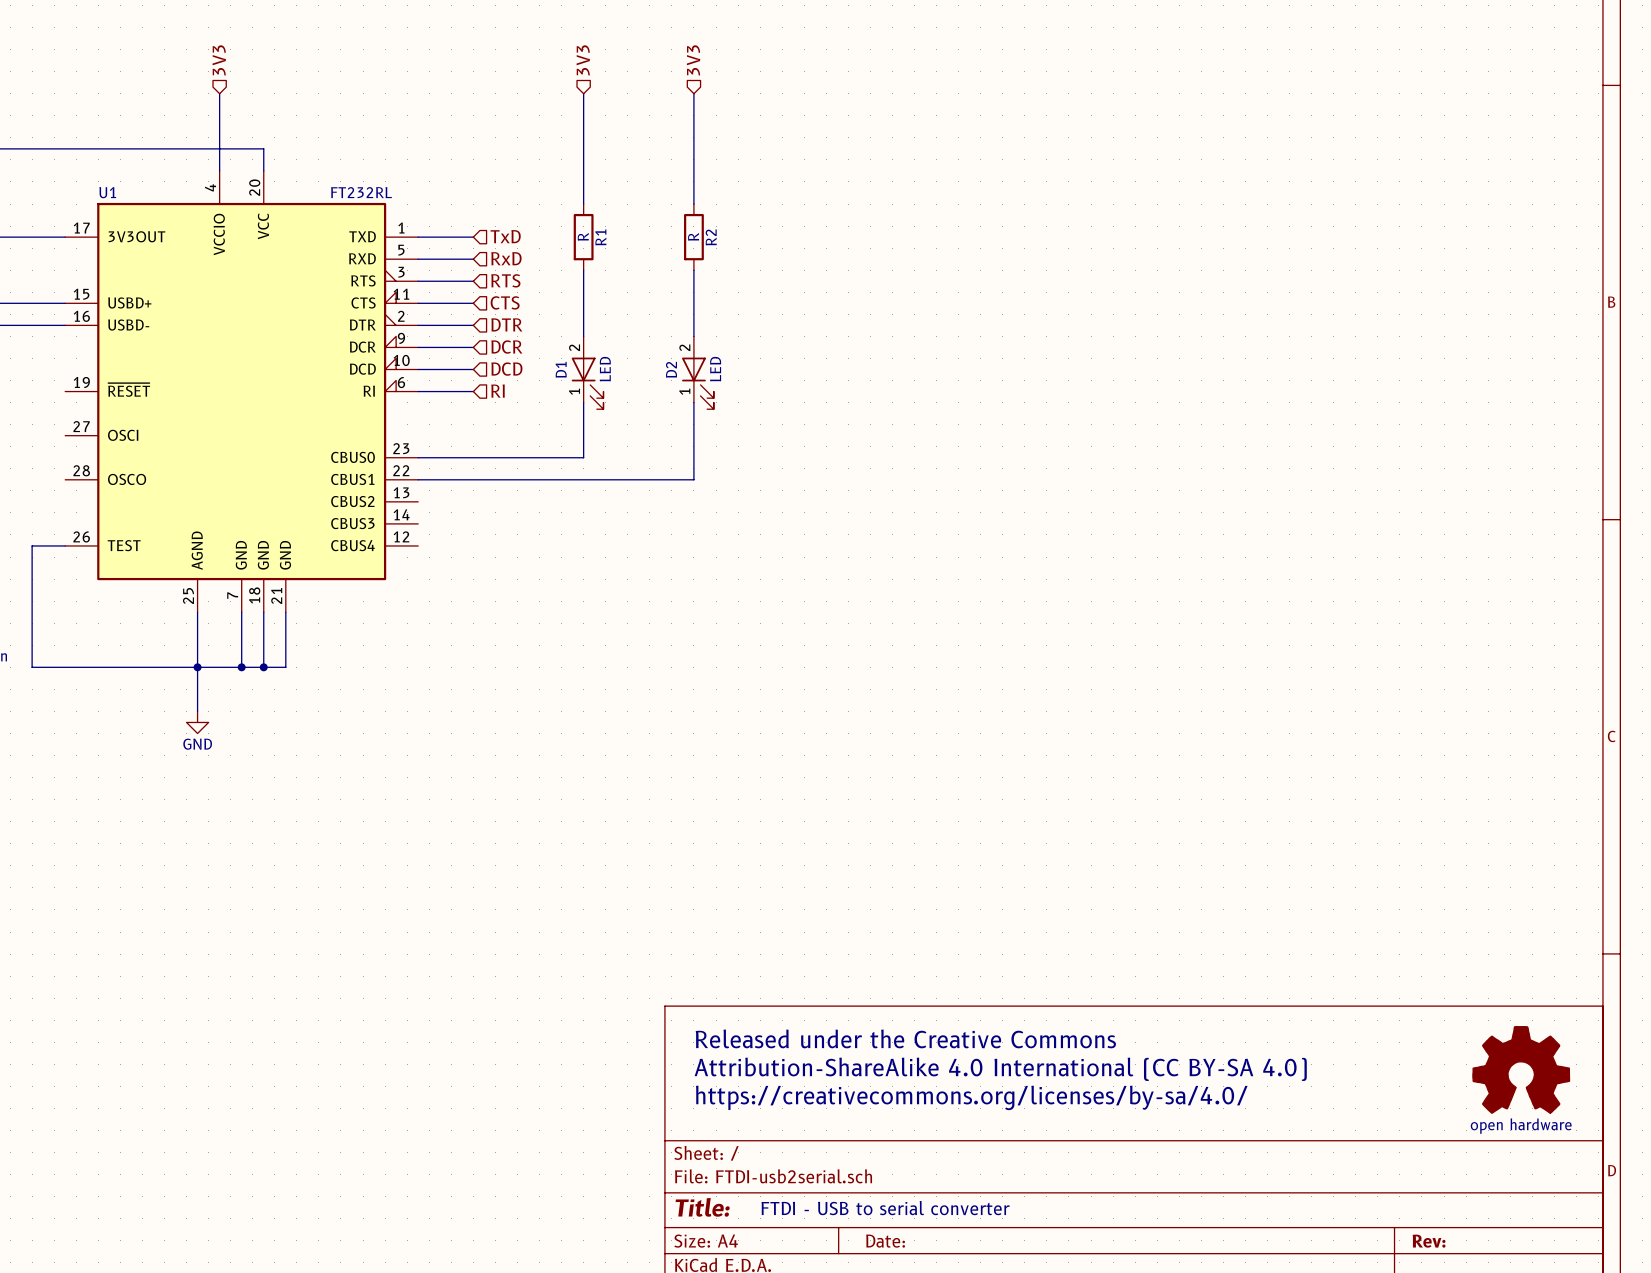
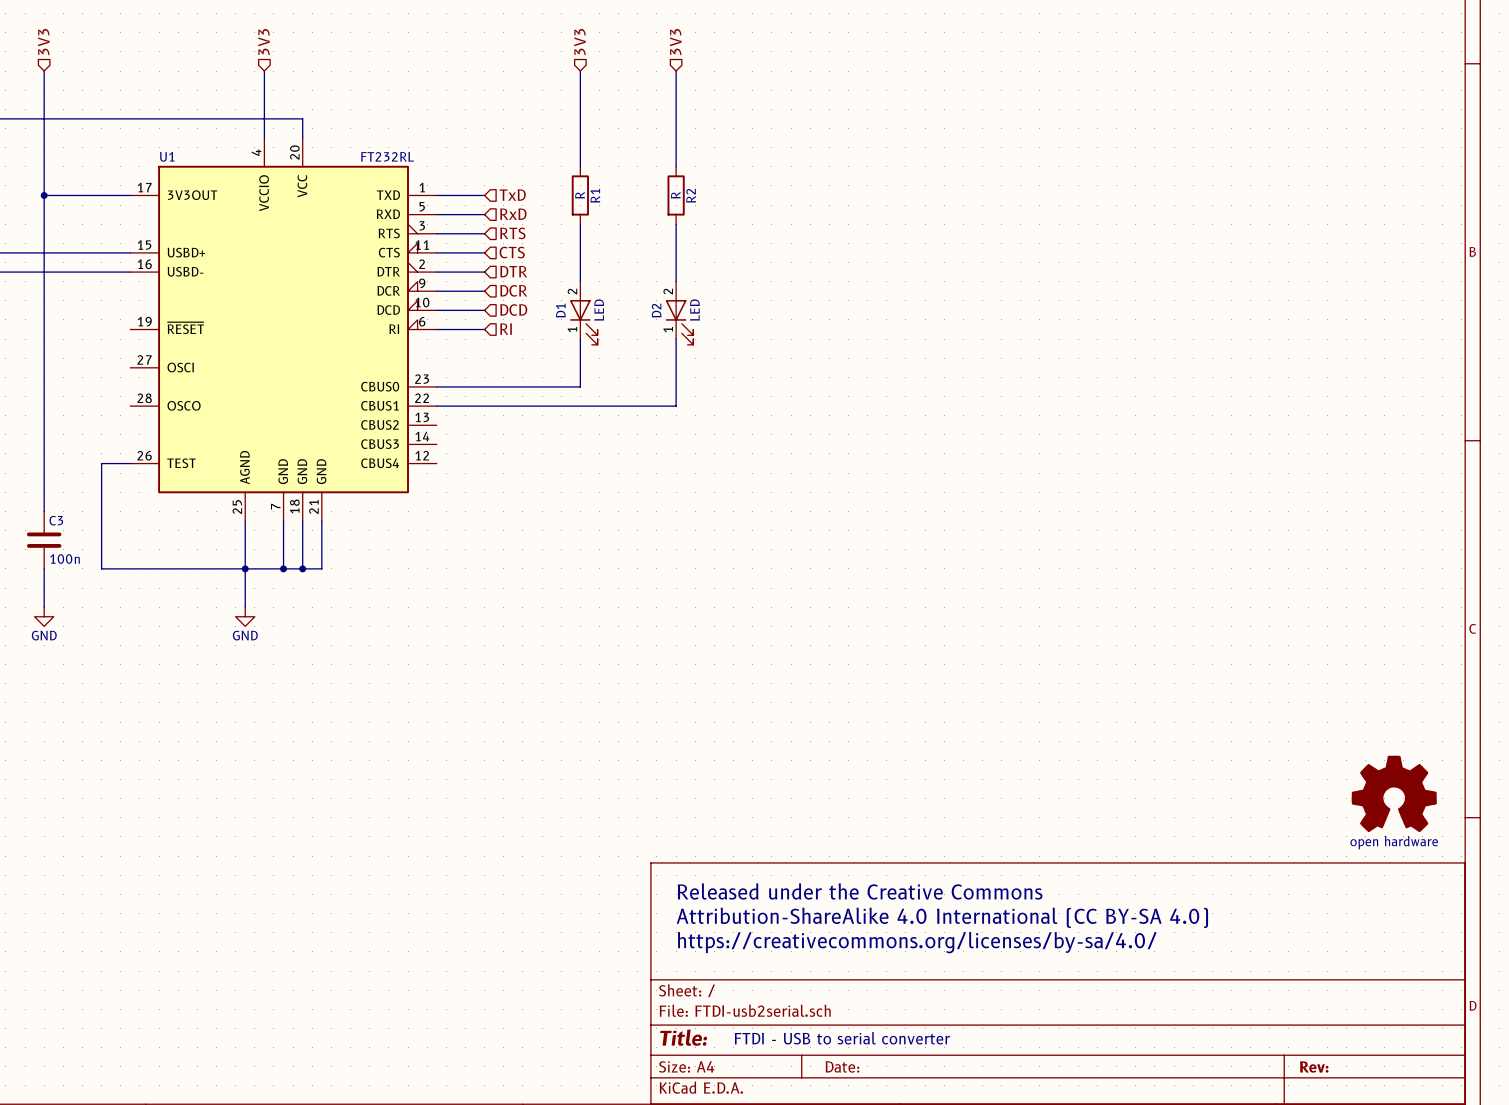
power symbol position: open hardware (1521, 1069) -> open hardware (1394, 793)

